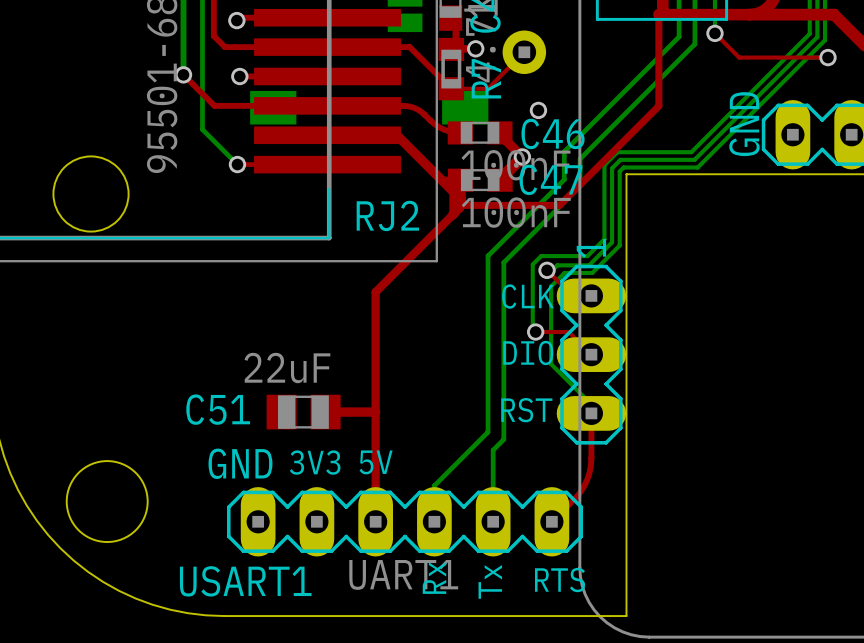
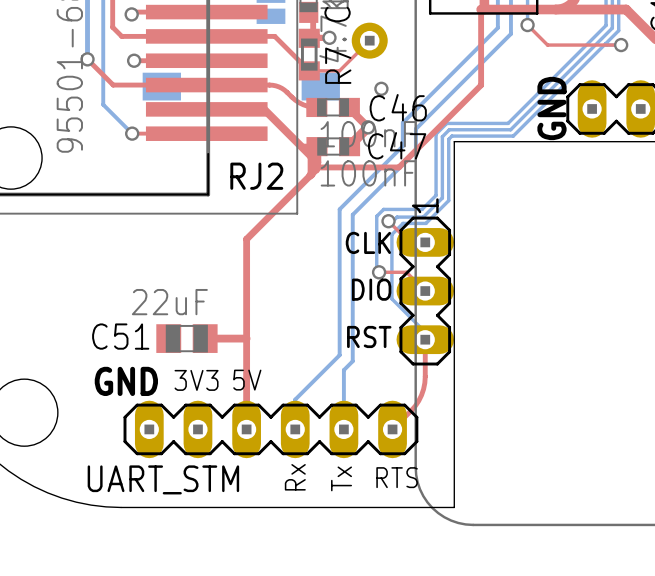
USART1 value: UART1 (403, 574) -> none
USART1 name: USART1 (245, 581) -> UART_STM (163, 479)

